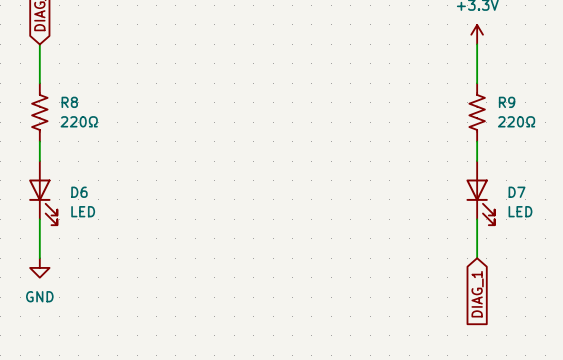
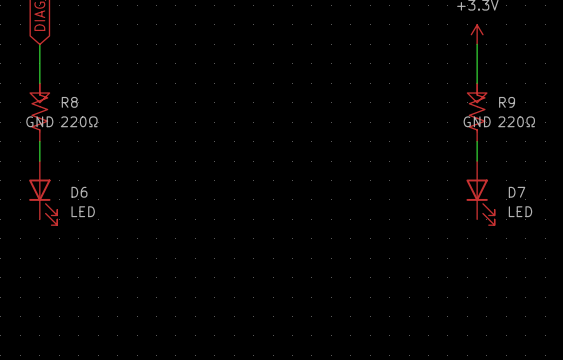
power symbol: none -> GND (39, 93)
power symbol: none -> GND (477, 93)
wire: (39, 219) (39, 258) -> none
wire: (477, 219) (477, 258) -> none
power symbol: GND (39, 267) -> none
global label: DIAG_1 (477, 294) -> none

